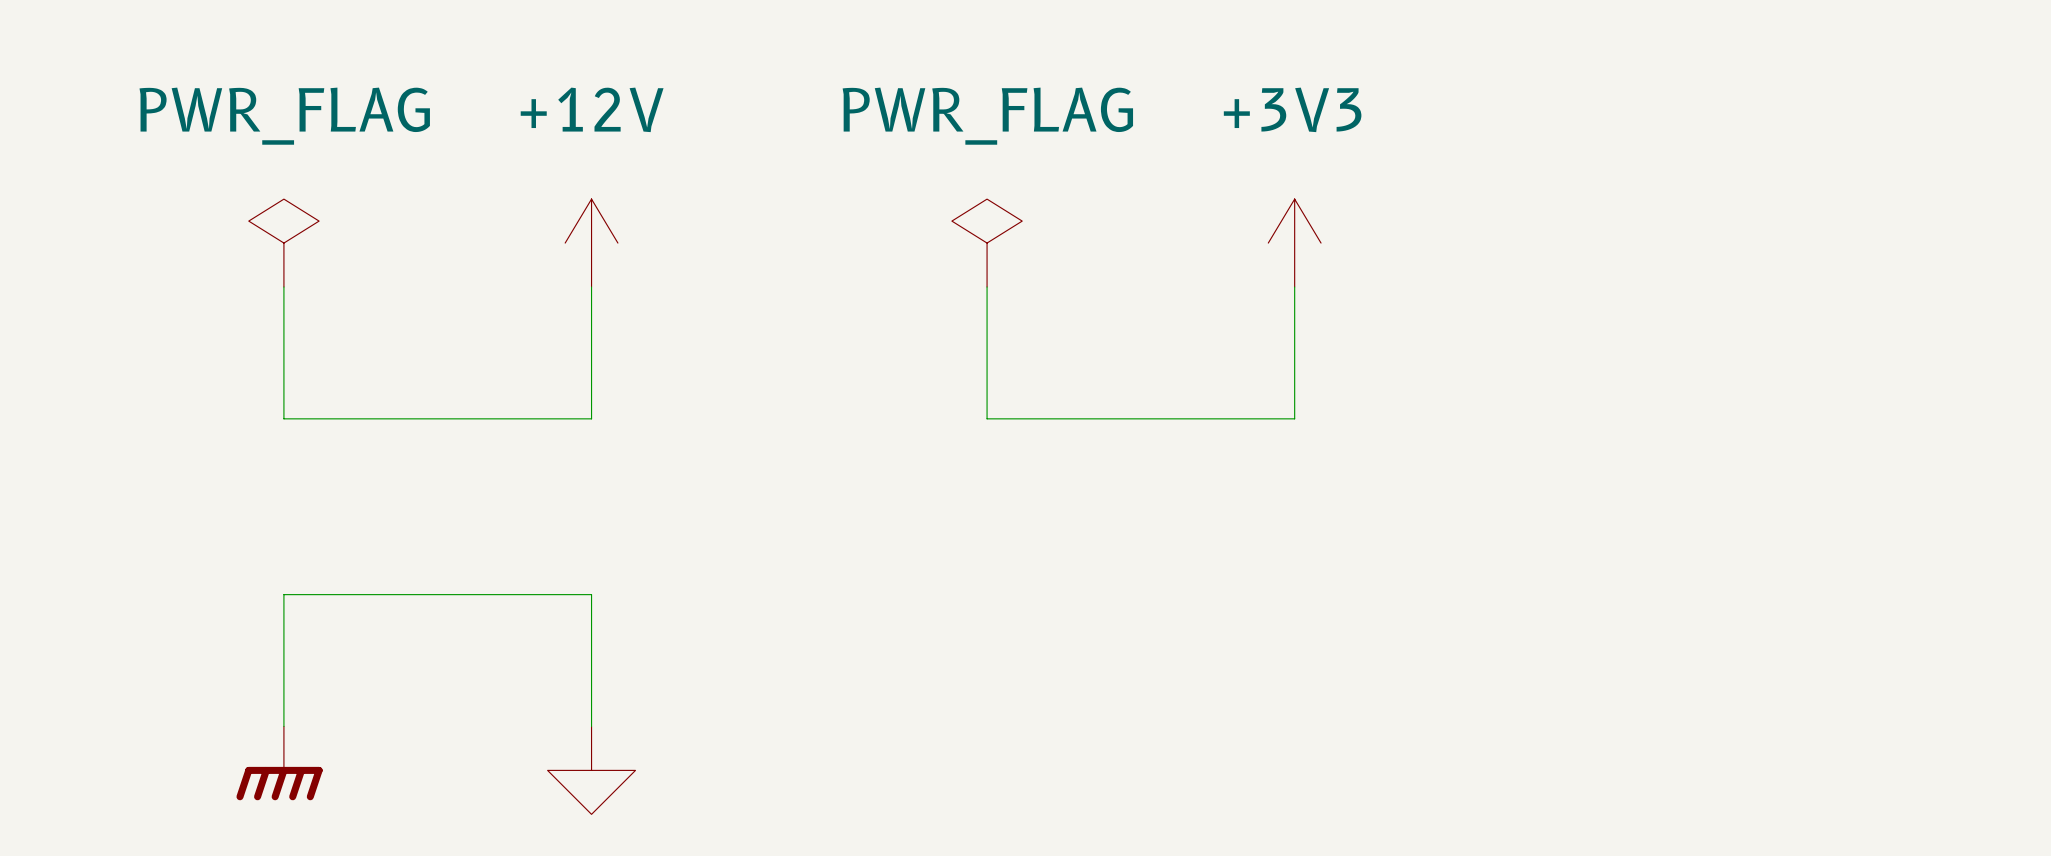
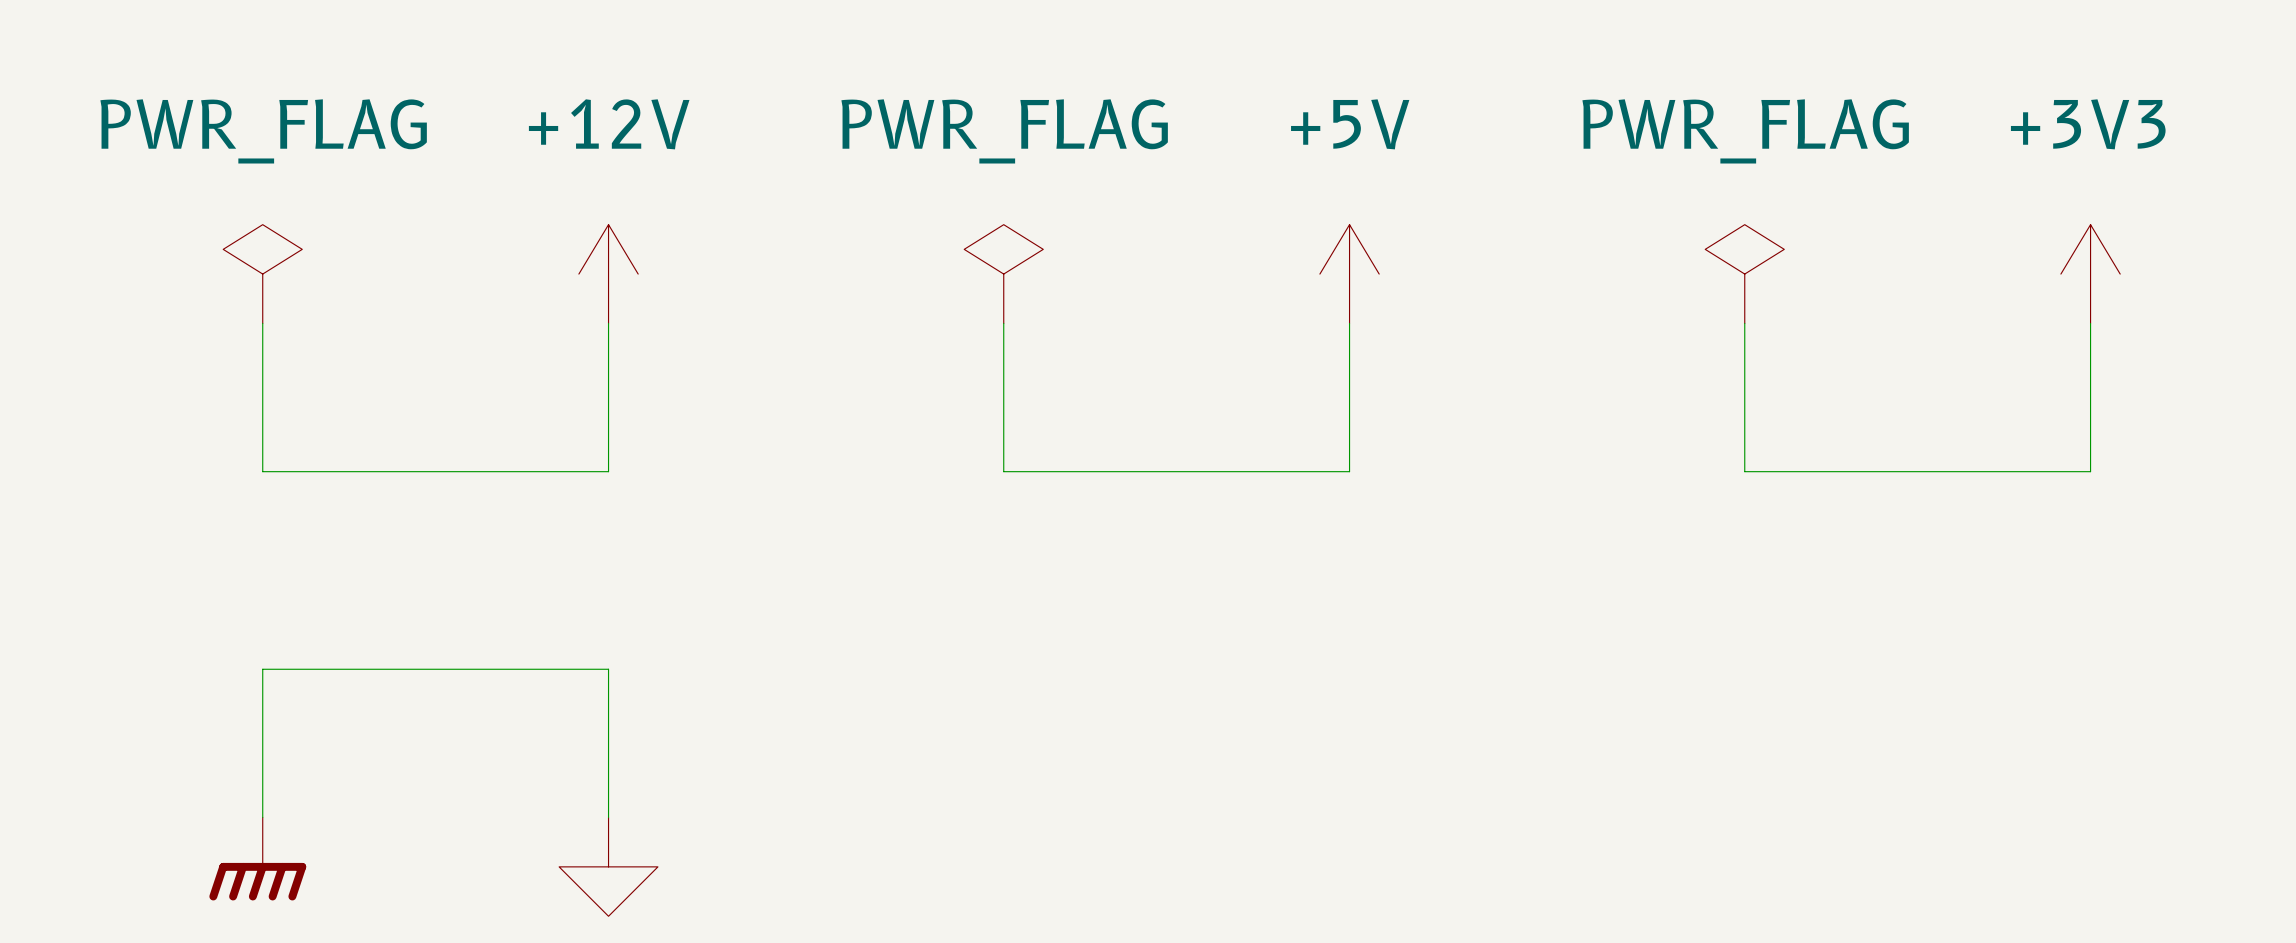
power symbol position: PWR_FLAG (987, 243) -> PWR_FLAG (1003, 274)
power symbol: none -> +5V (1349, 274)
power symbol position: +3V3 (1294, 243) -> +3V3 (2090, 274)
power symbol: none -> PWR_FLAG (1744, 274)
wire: (987, 287) (987, 418) -> (1003, 323) (1003, 471) (1053, 471)
wire: (1294, 287) (1294, 418) (1250, 418) -> (1349, 323) (1349, 471)
wire: none -> (1744, 323) (1744, 471) (2090, 471) (2090, 323)

